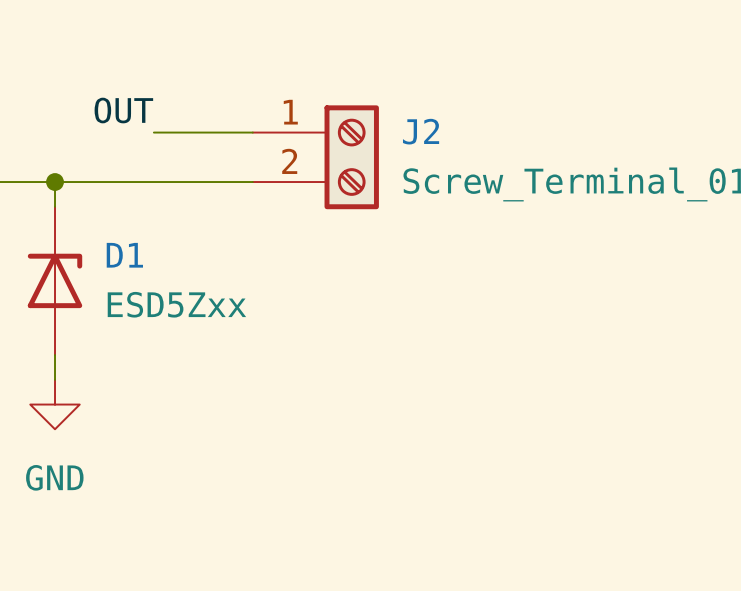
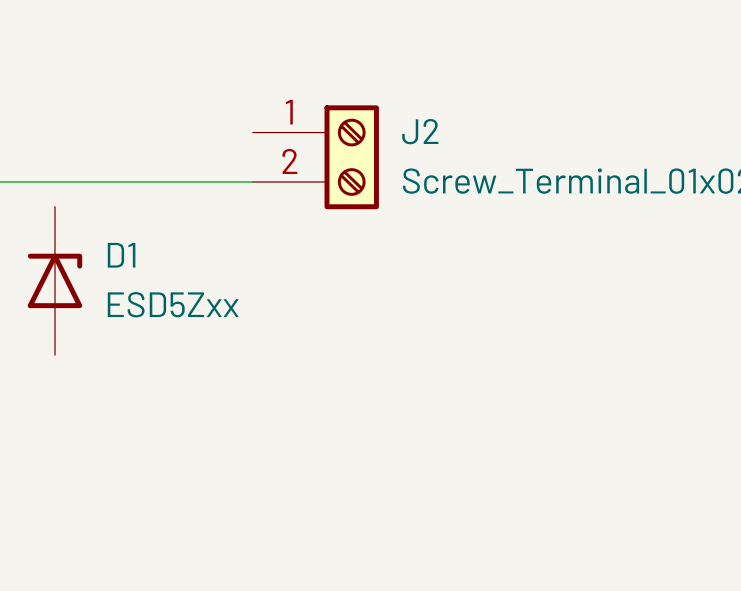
label: OUT (123, 110) -> none
wire: (153, 132) (252, 132) -> none
wire: (55, 182) (55, 206) -> none
junction: (55, 182) -> none
wire: (55, 355) (55, 379) -> none
power symbol: GND (55, 404) -> none

